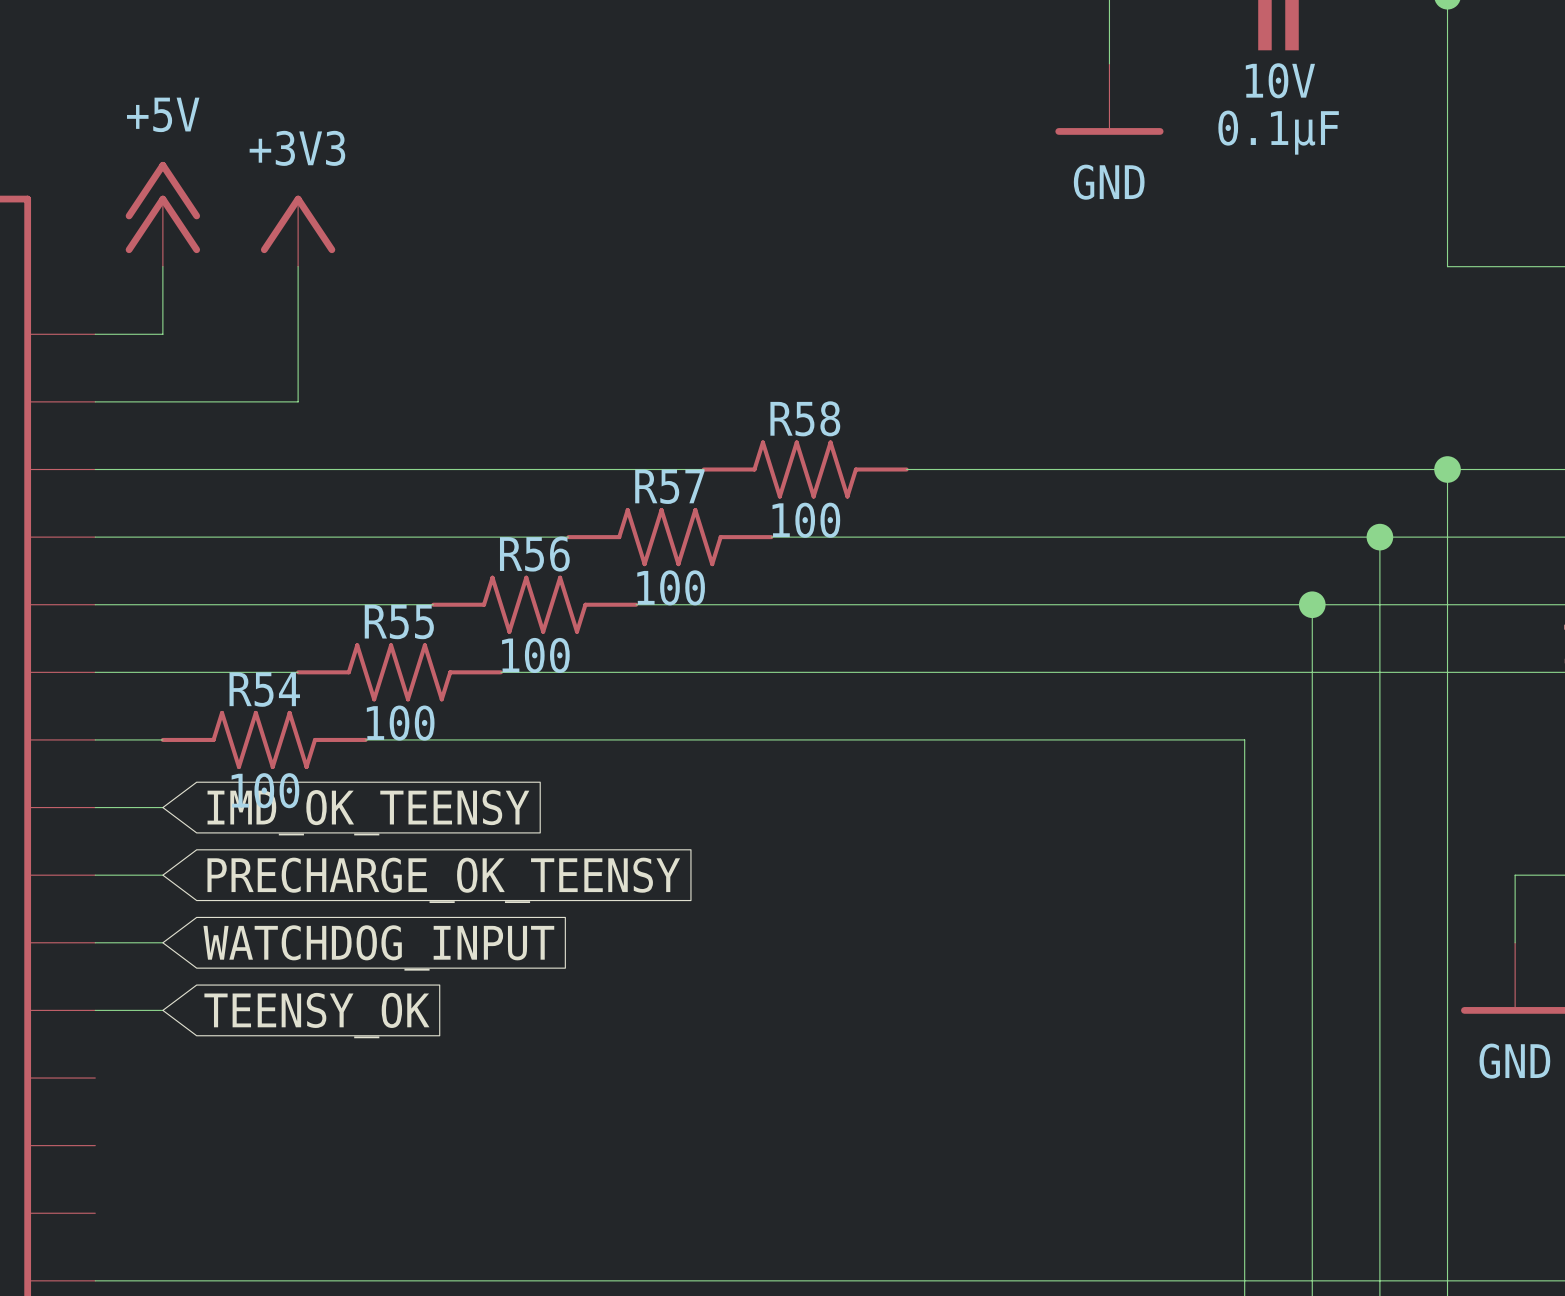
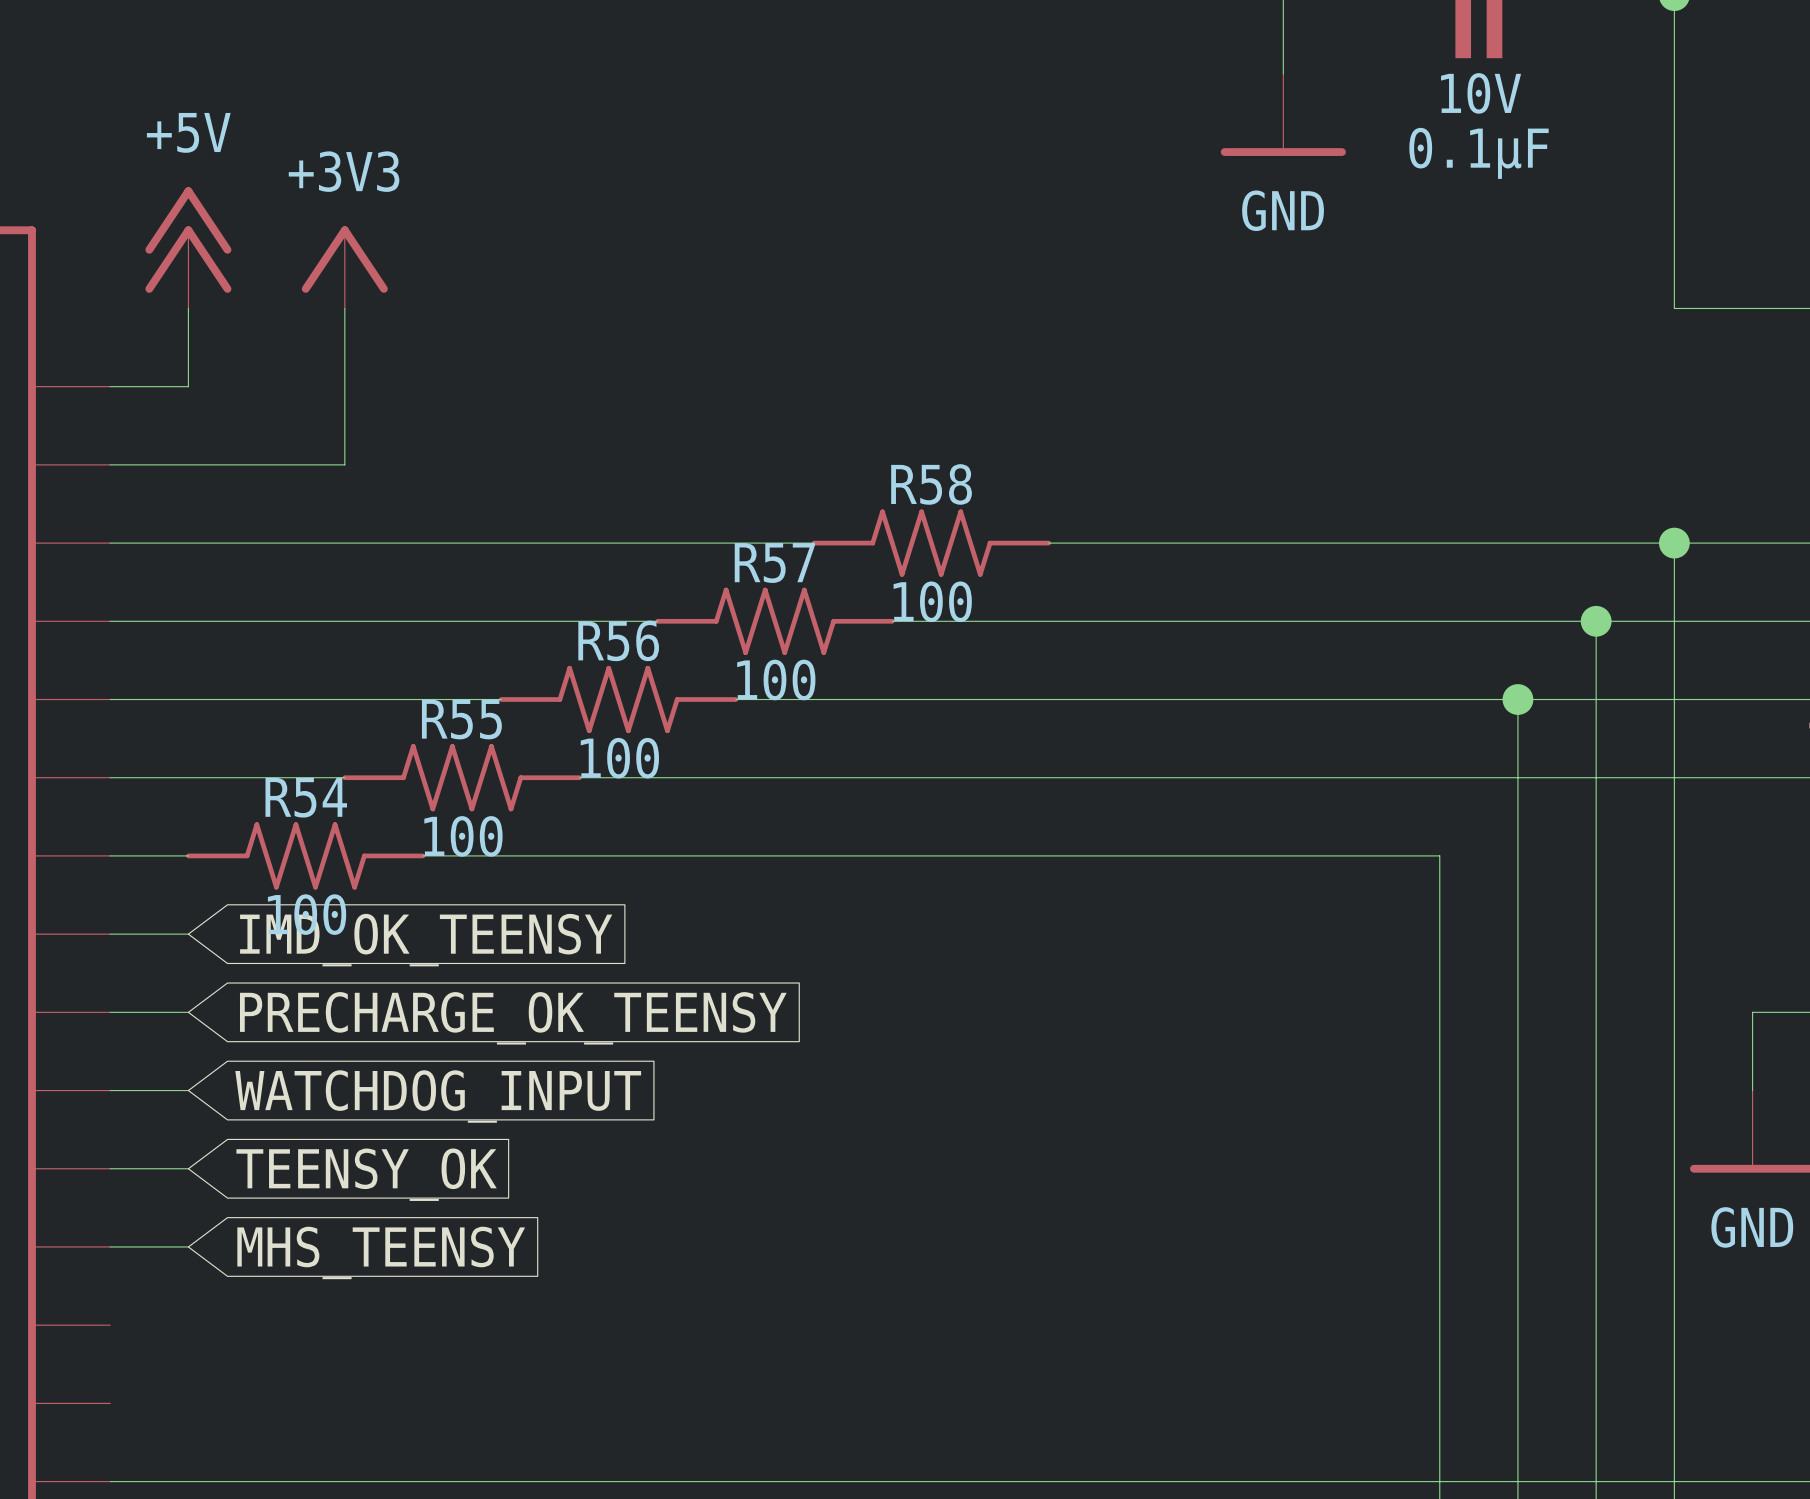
wire: none -> (110, 1246) (188, 1246)
global label: none -> MHS_TEENSY (381, 1252)

